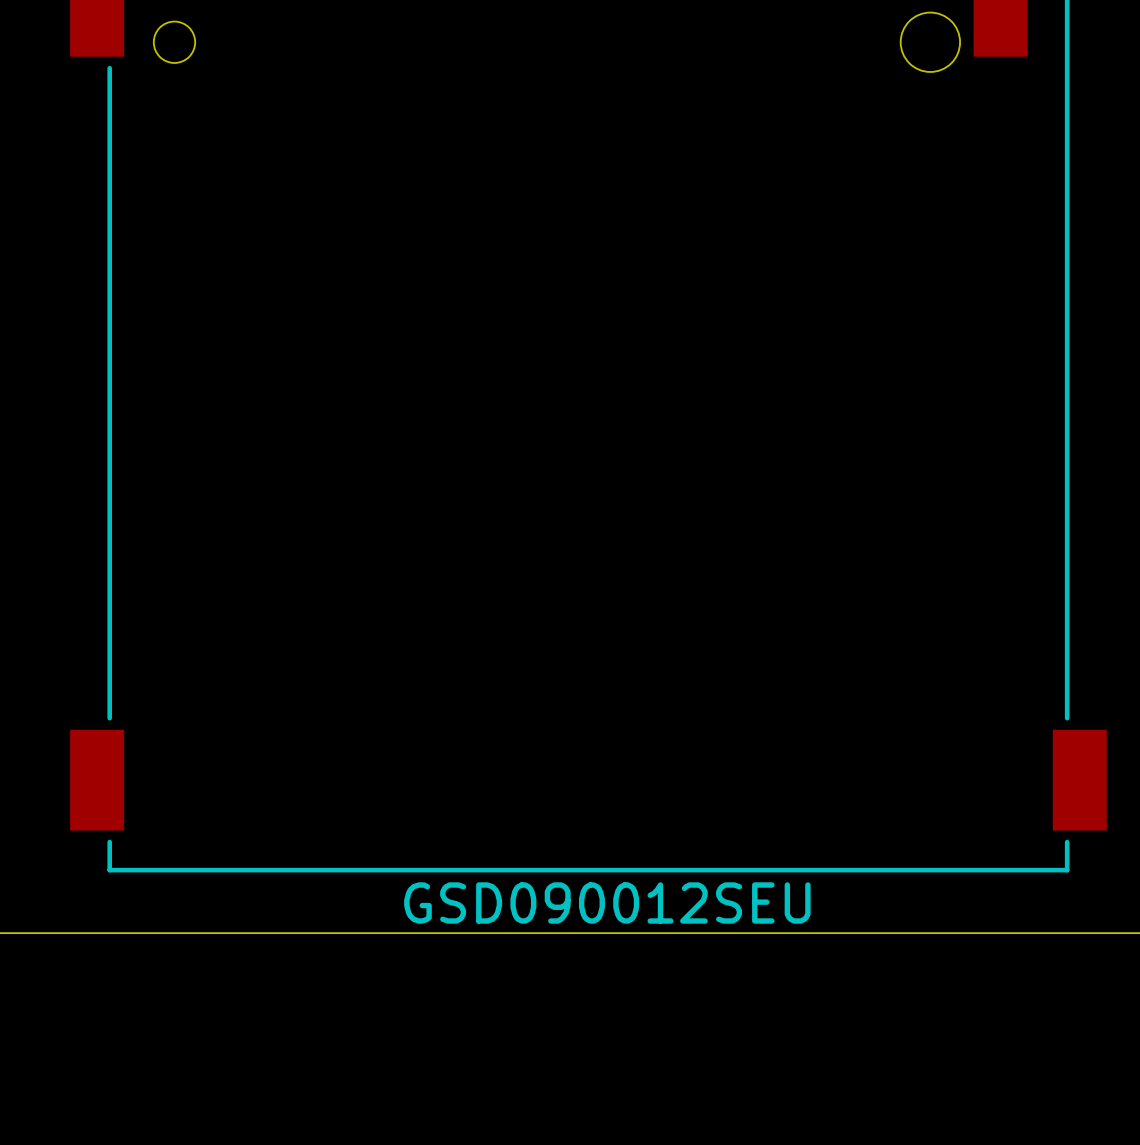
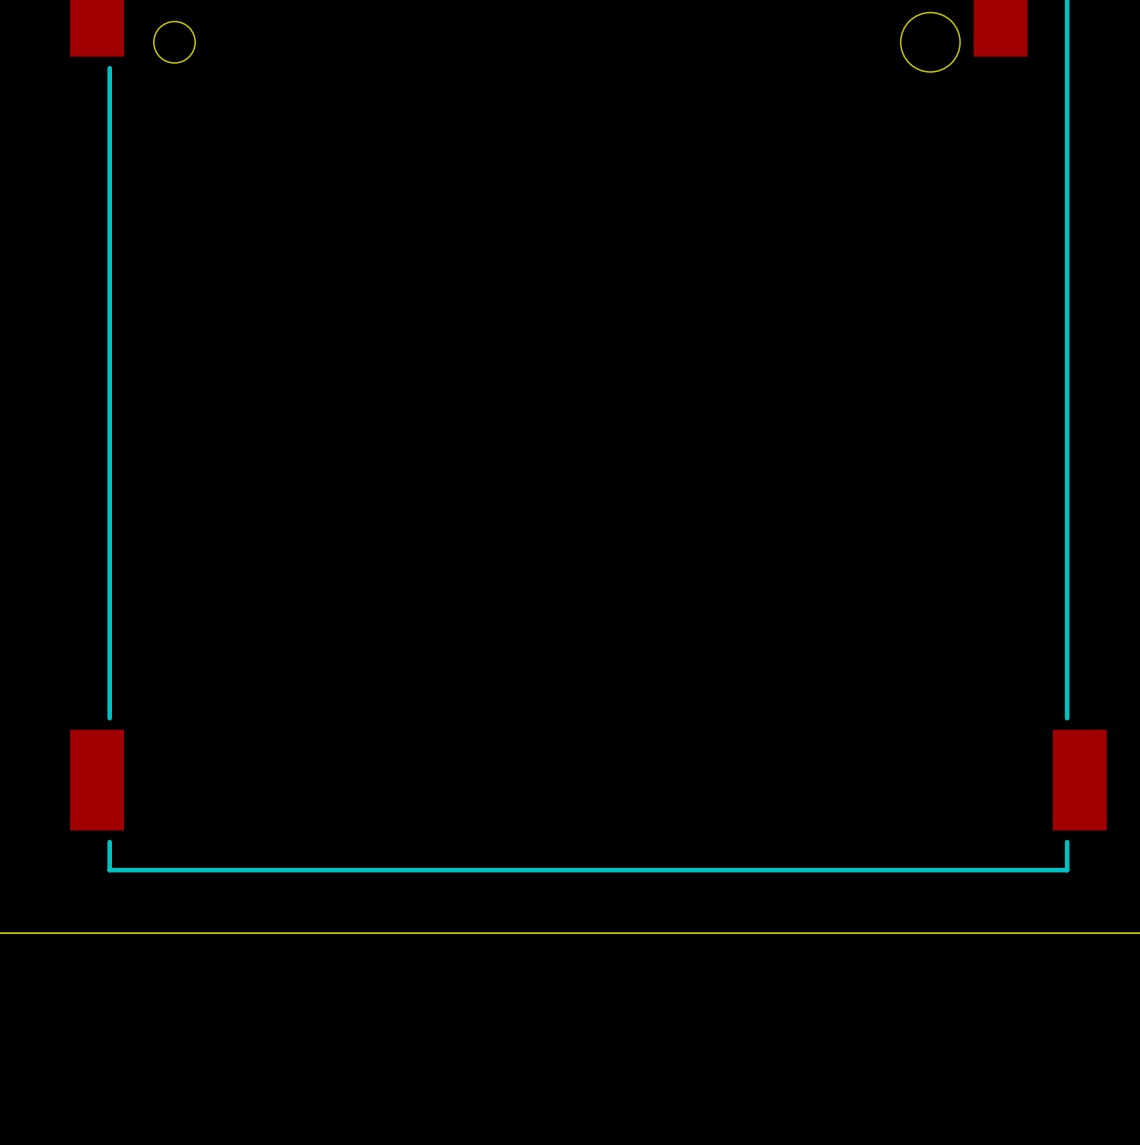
part value: GSD090012SEU (607, 902) -> none

